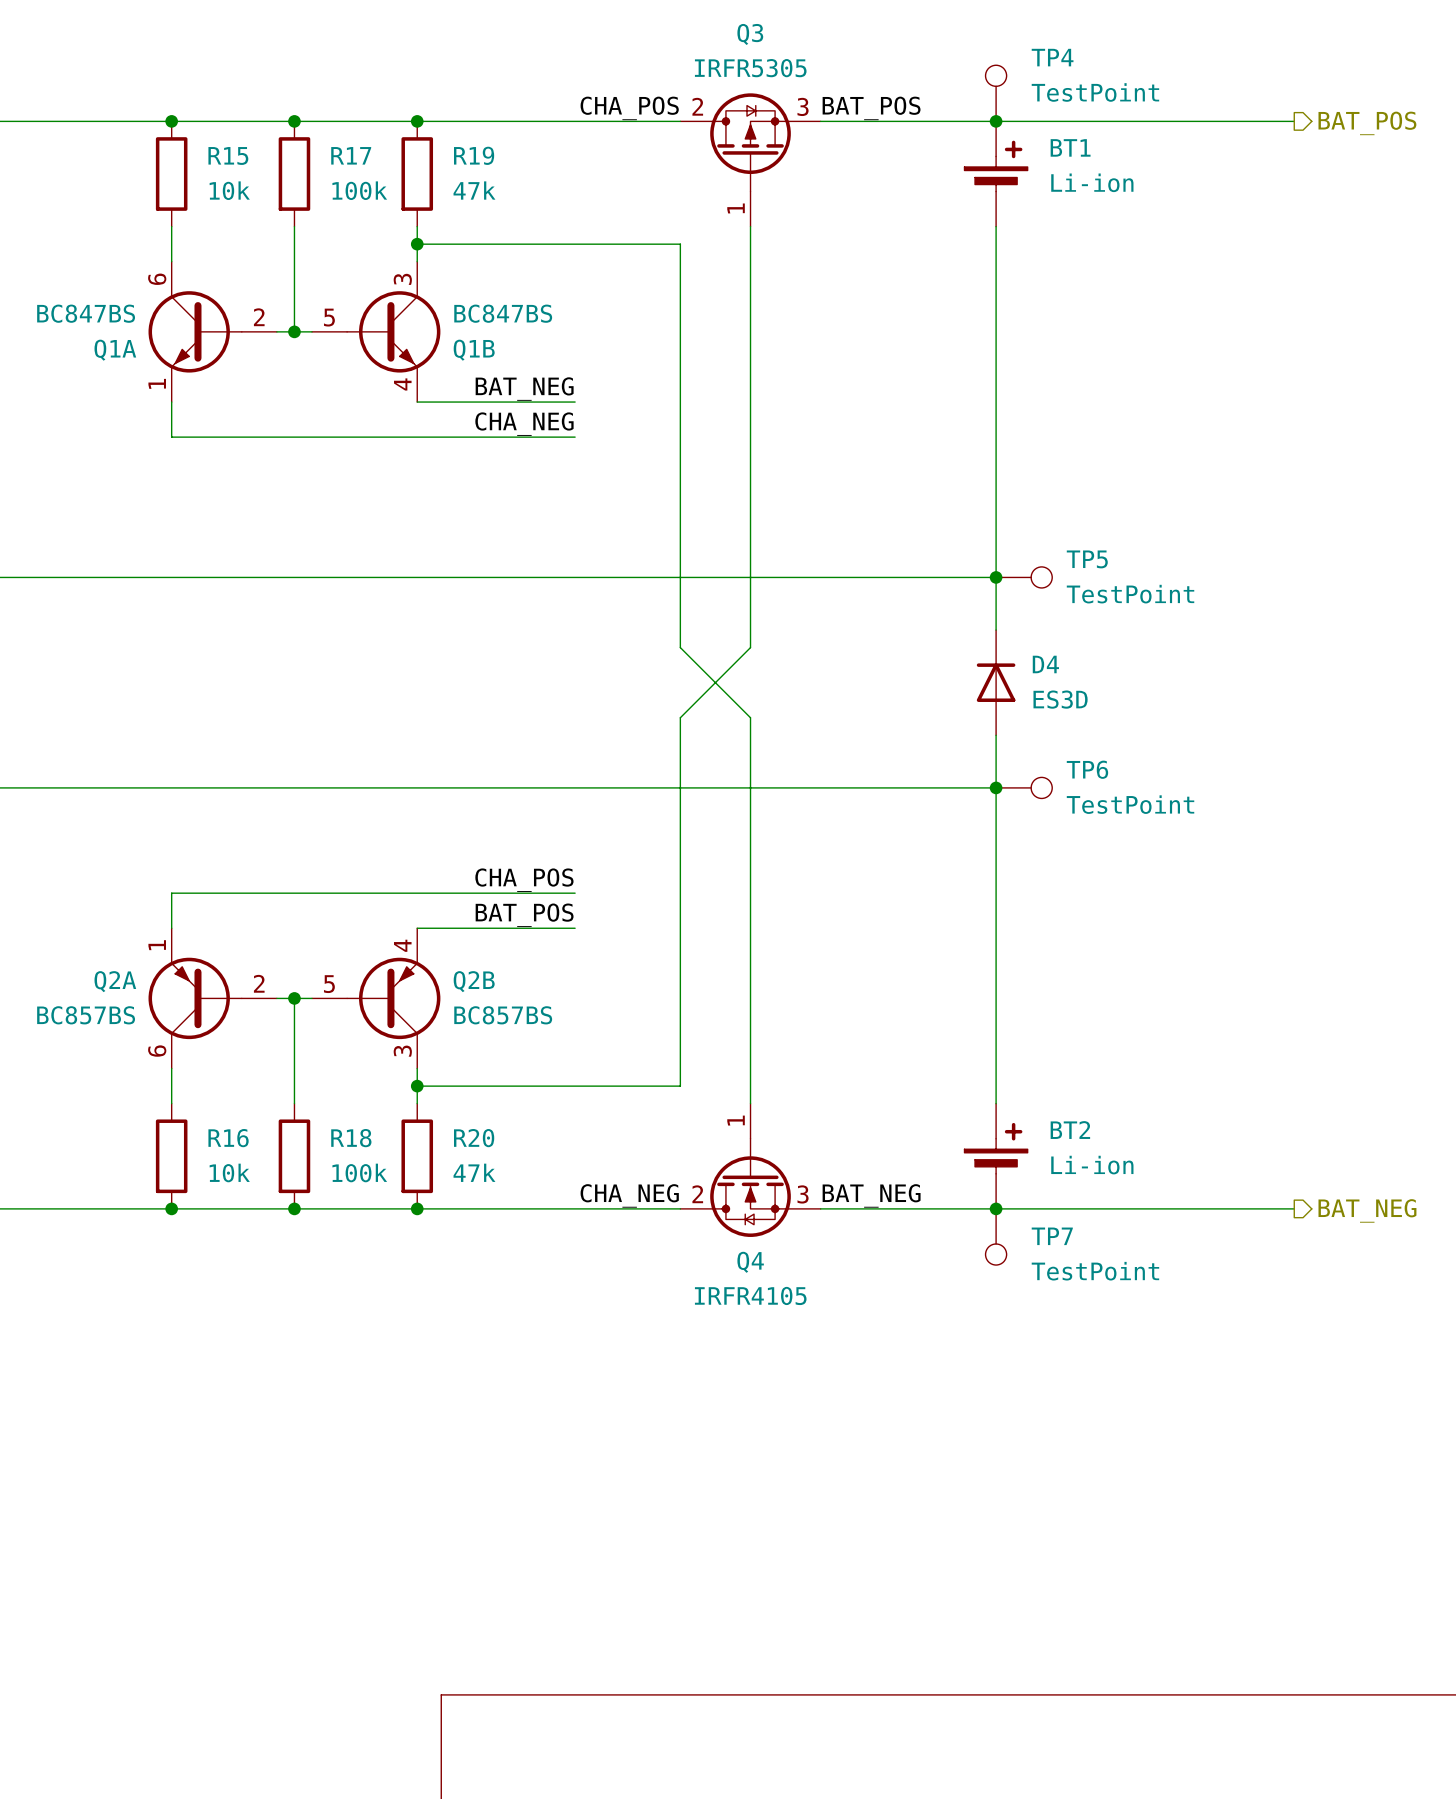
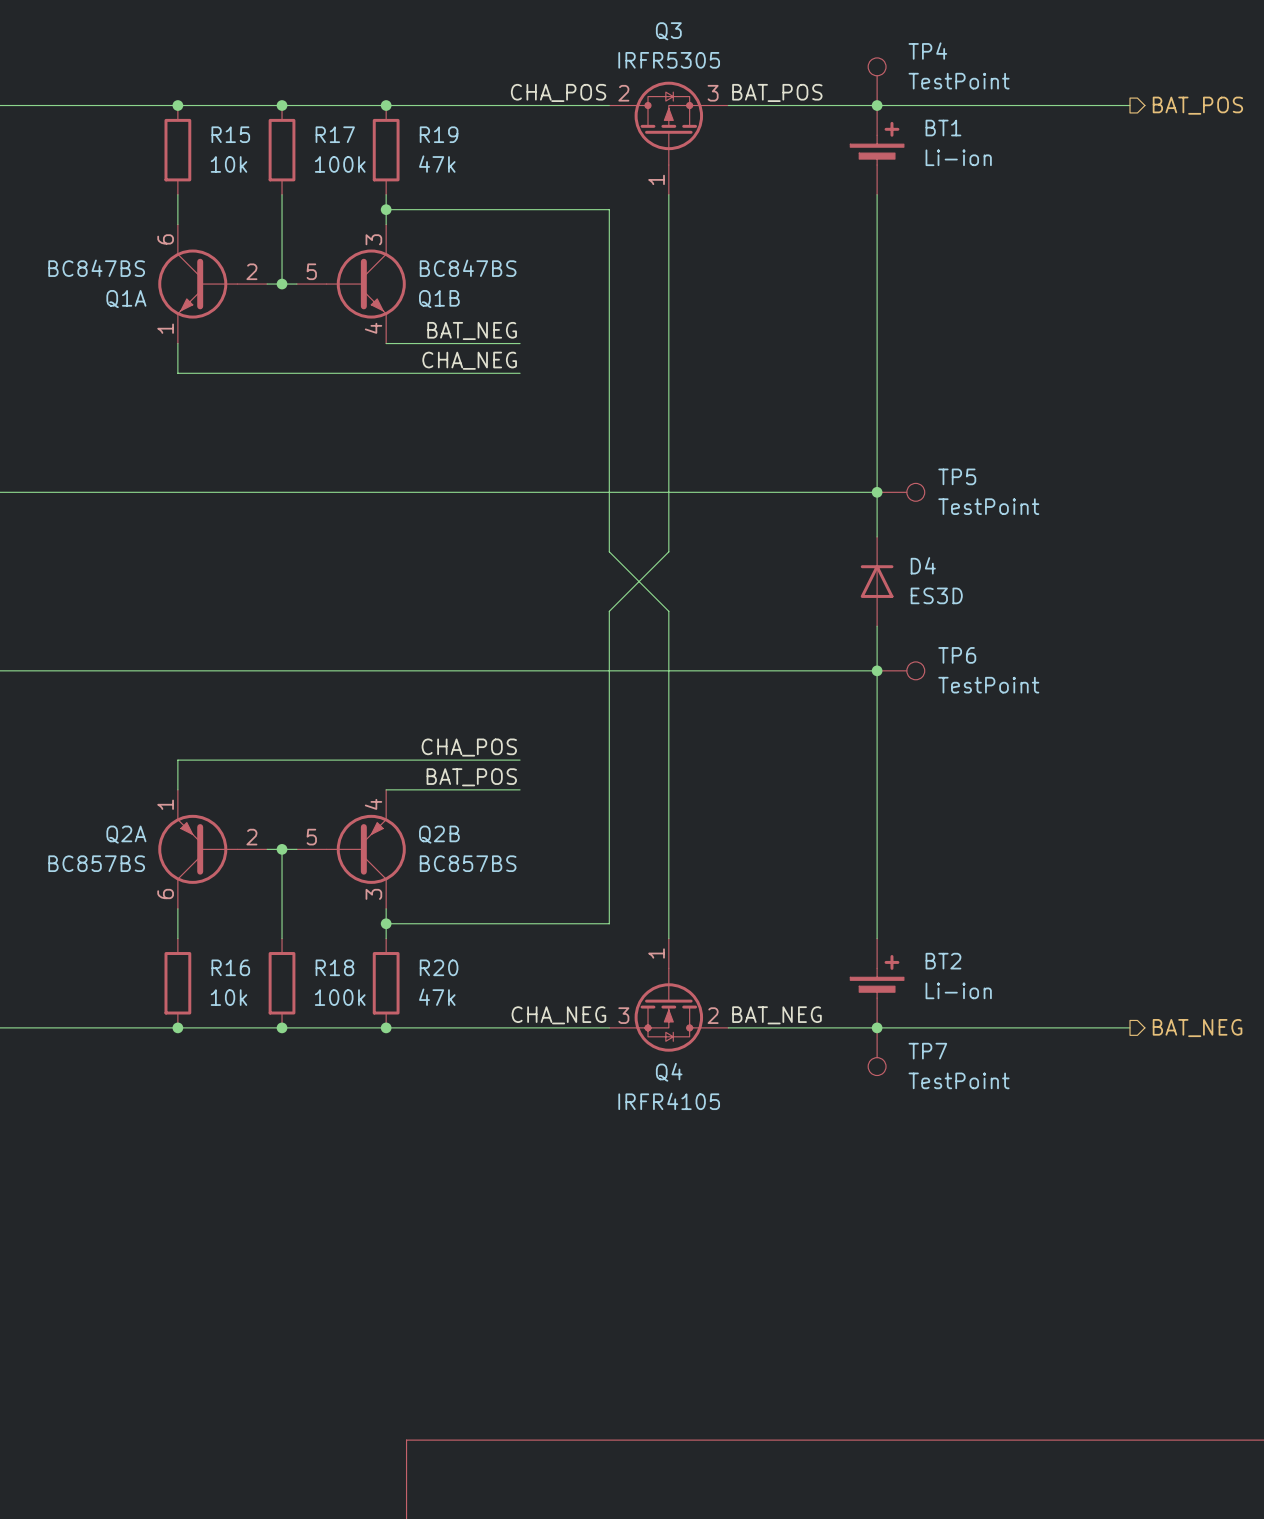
Q4 flip: as is (750, 1187) -> left-right (668, 1010)

